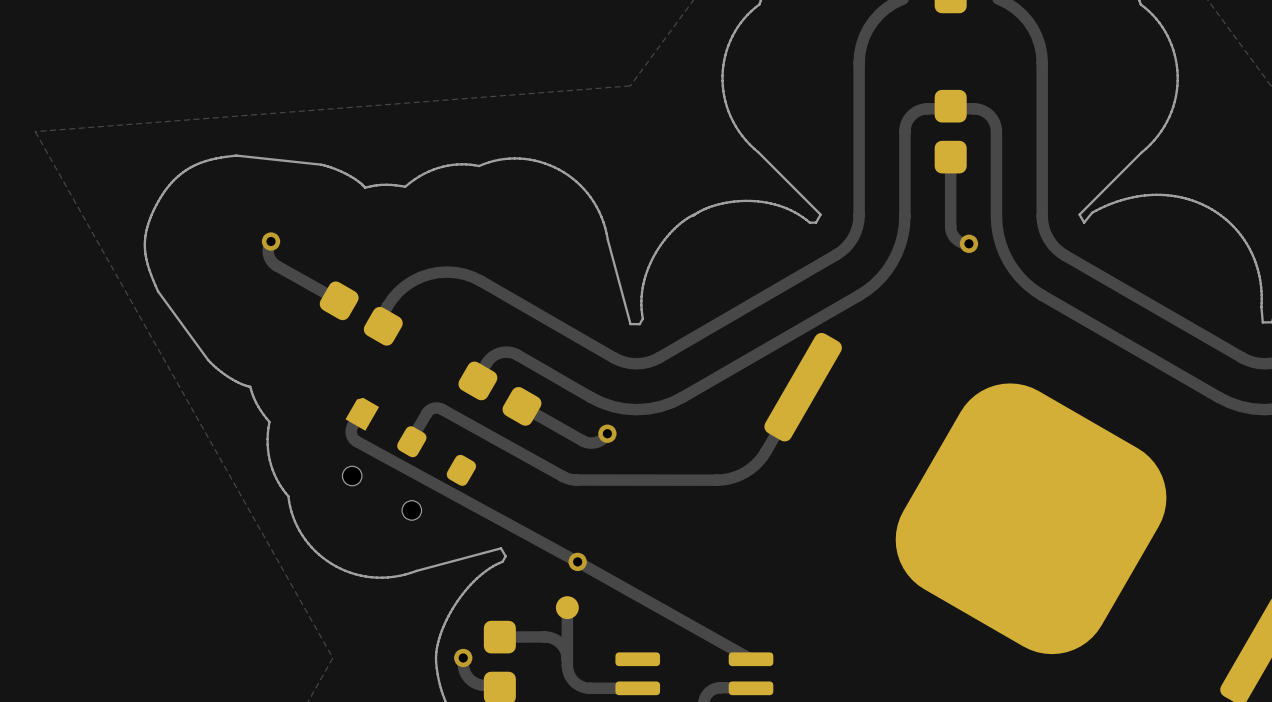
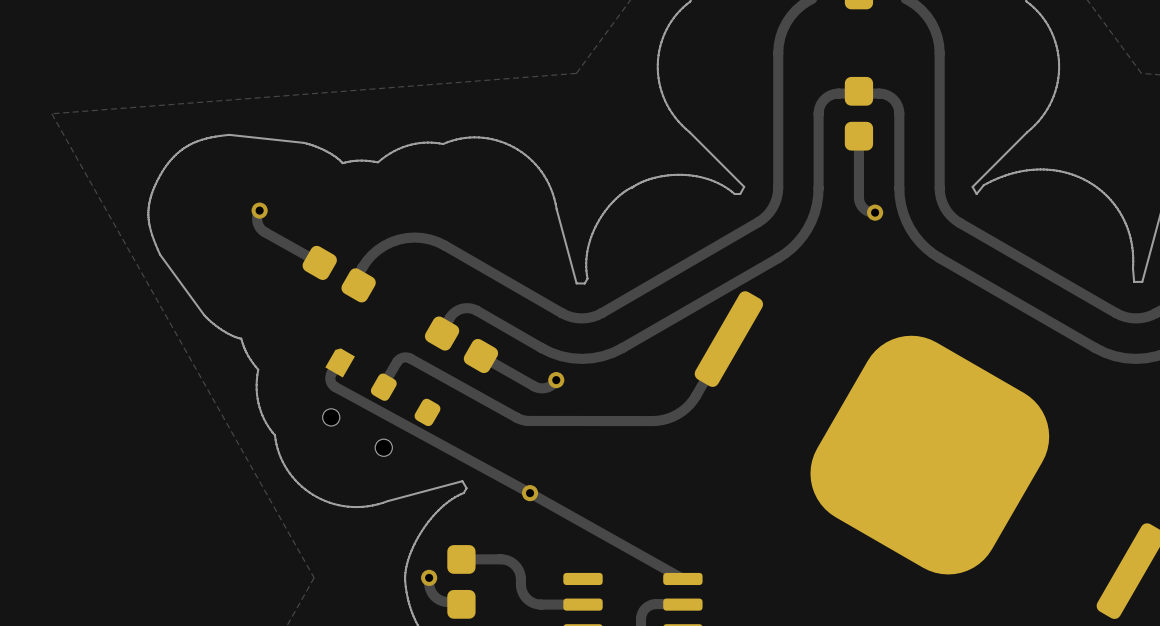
track: (567, 607) (567, 659) -> none
part: (567, 607) -> none

